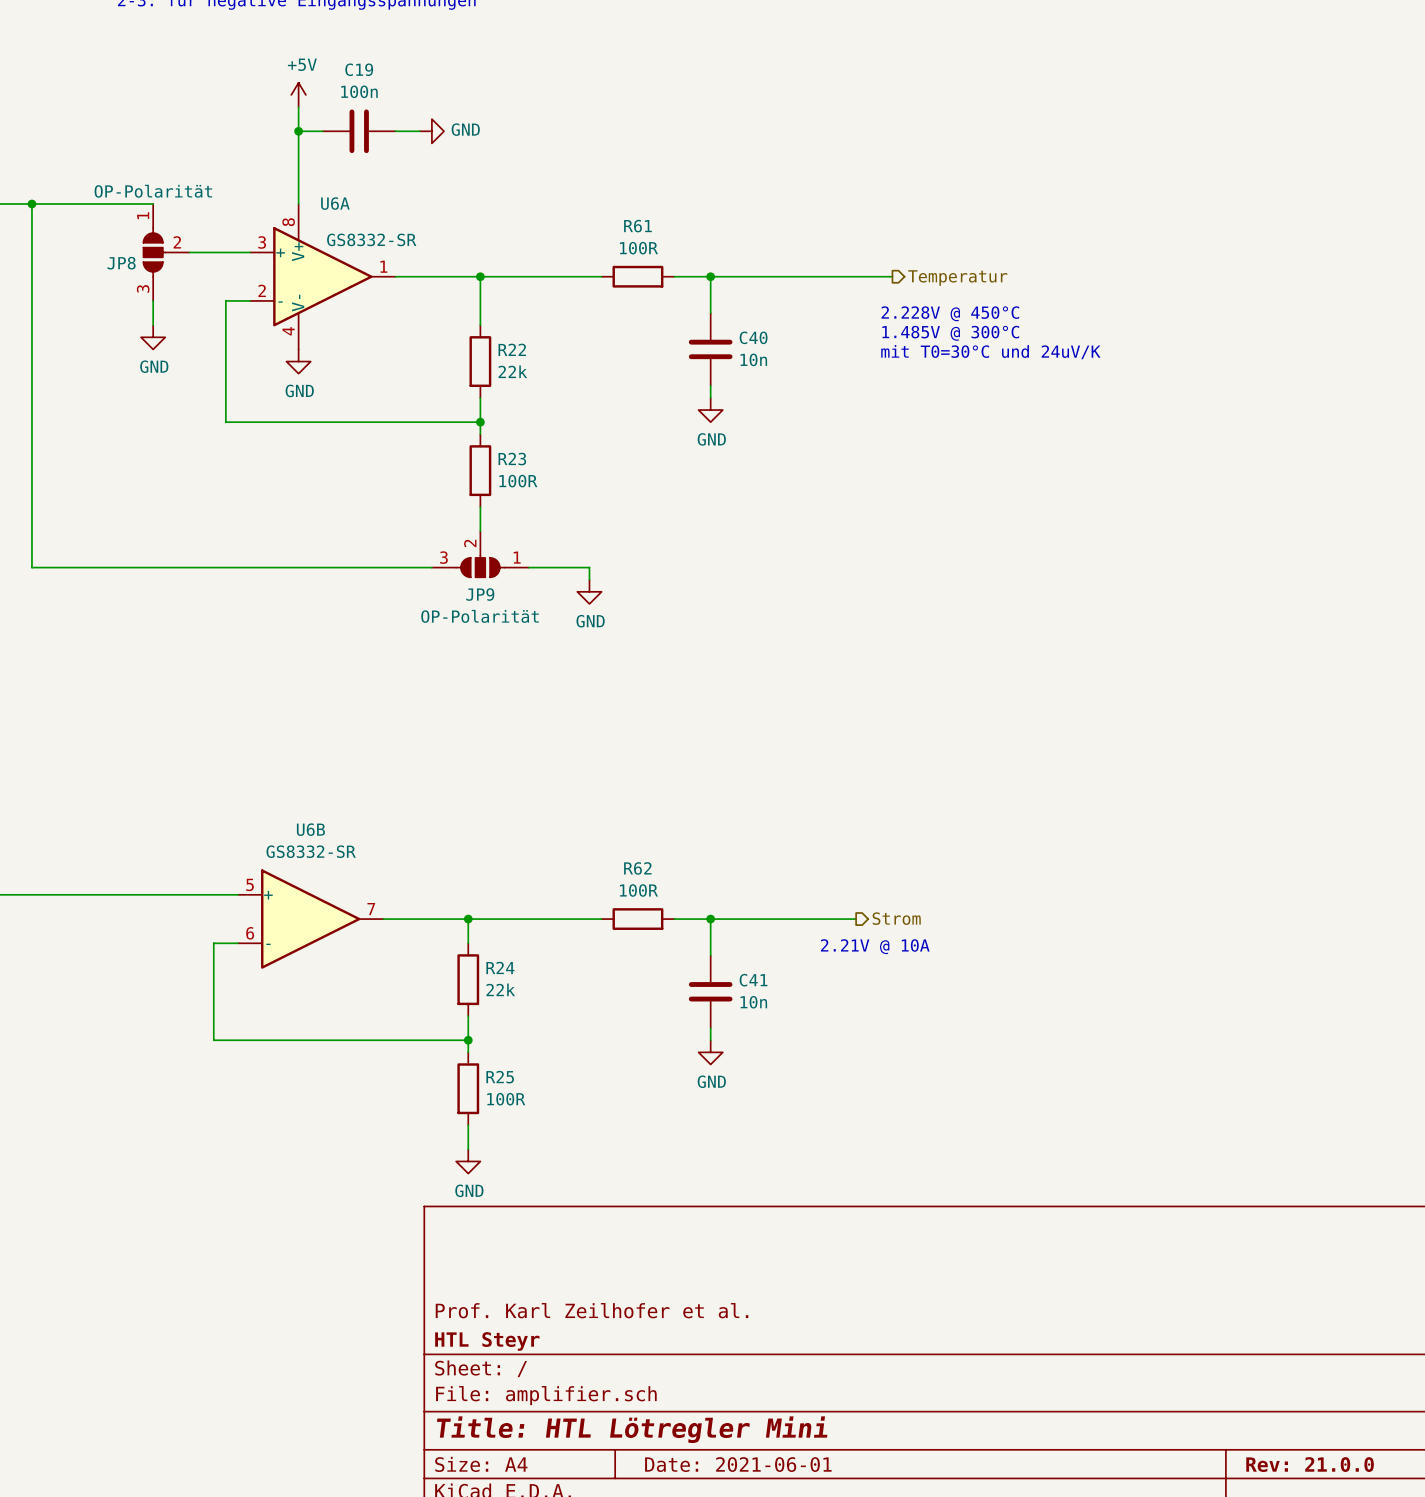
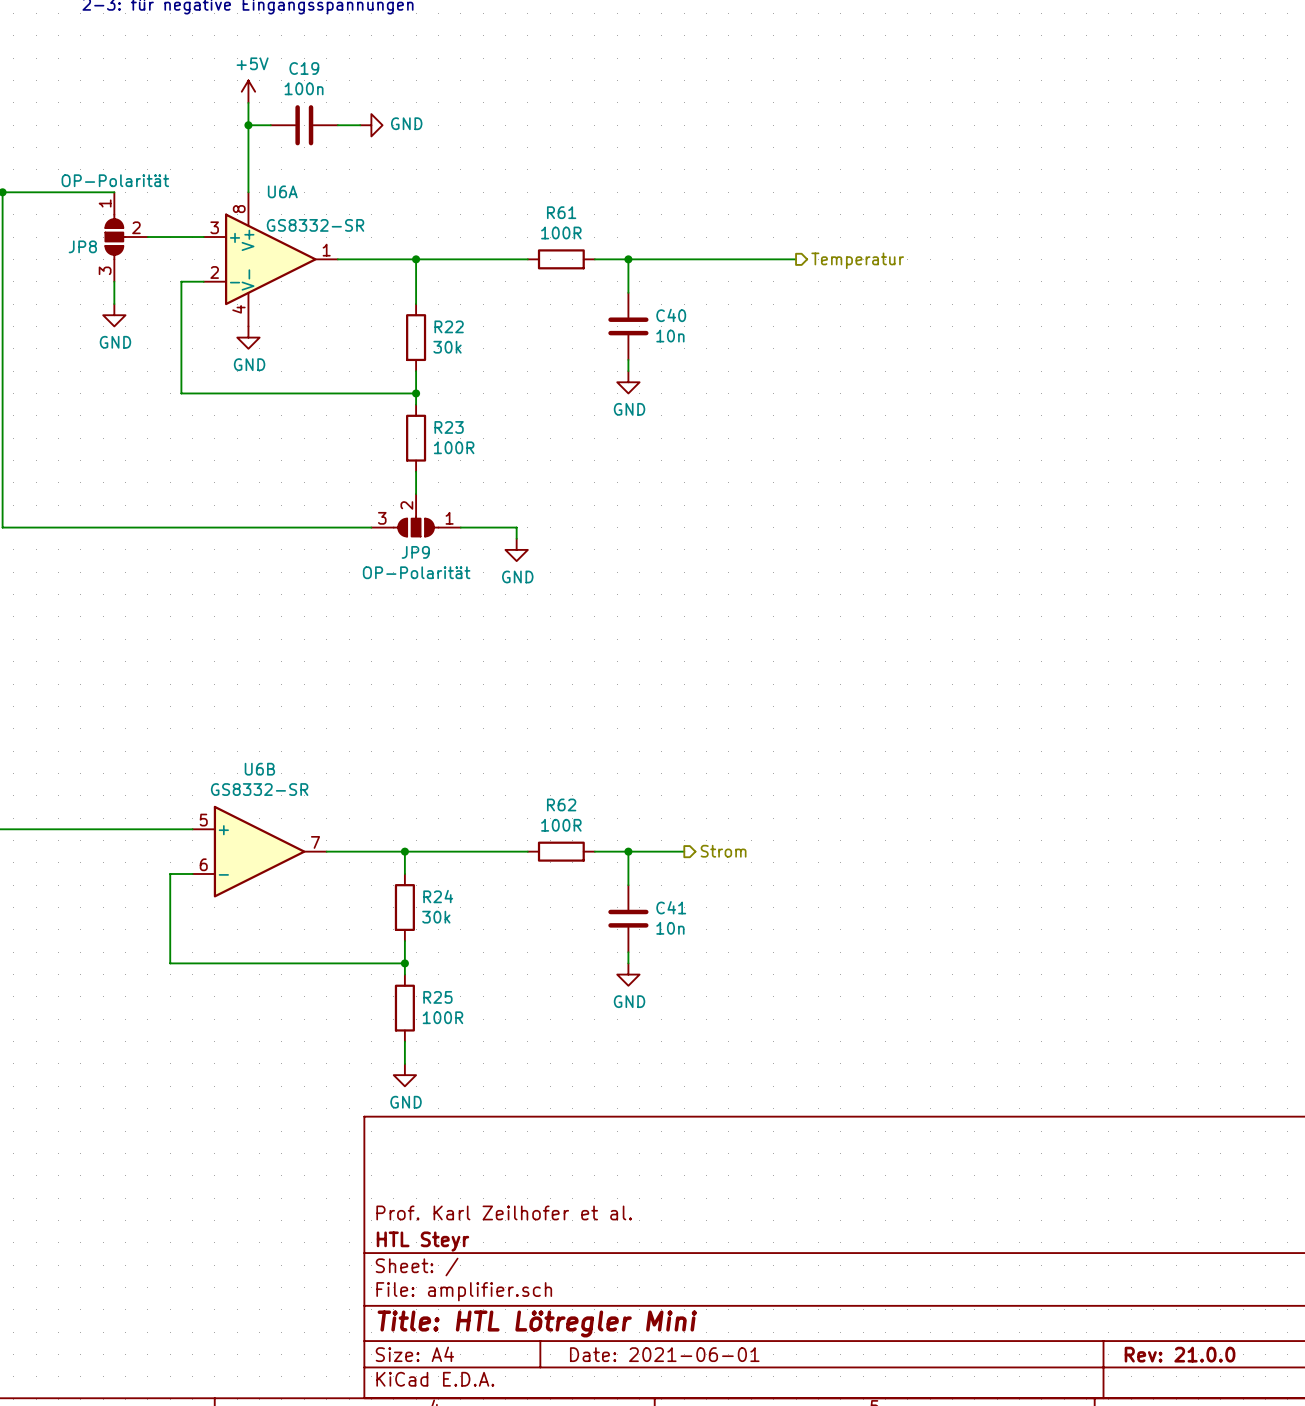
text: 2.228V @ 450°C (950, 313) -> none
text: 1.485V @ 300°C (950, 333) -> none
text: mit T0=30°C und 24uV/K (990, 352) -> none
R22 value: 22k (512, 371) -> 30k (447, 347)
hierarchical label position: Strom (896, 918) -> Strom (723, 851)
wire: (771, 919) (856, 919) -> none
text: 2.21V @ 10A (875, 946) -> none
R24 value: 22k (500, 989) -> 30k (436, 917)

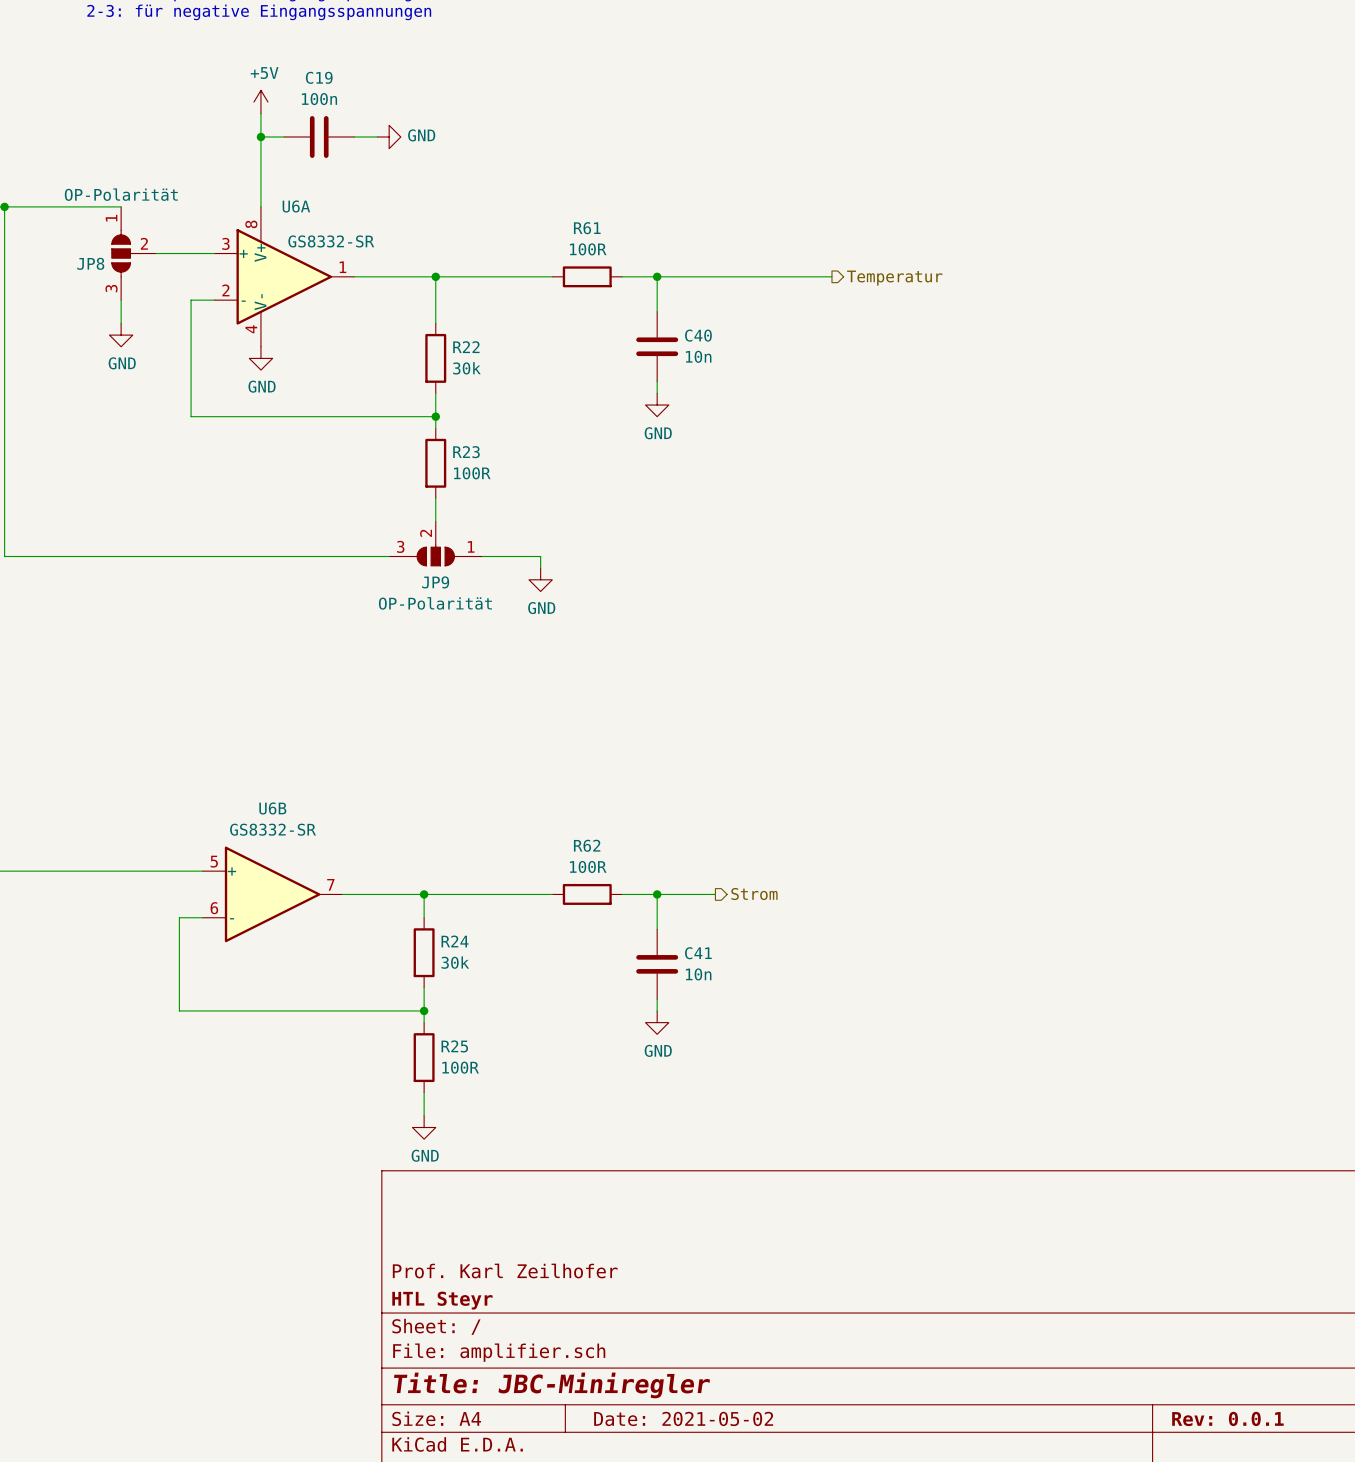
title block: Prof. Karl Zeilhofer et al. (504, 1212) -> Prof. Karl Zeilhofer (505, 1271)
title block: Title: HTL Lötregler Mini (537, 1323) -> Title: JBC-Miniregler (551, 1385)
title block: Date: 2021-06-01 (664, 1354) -> Date: 2021-05-02 (683, 1418)
title block: Rev: 21.0.0 (1180, 1354) -> Rev: 0.0.1 (1227, 1418)

